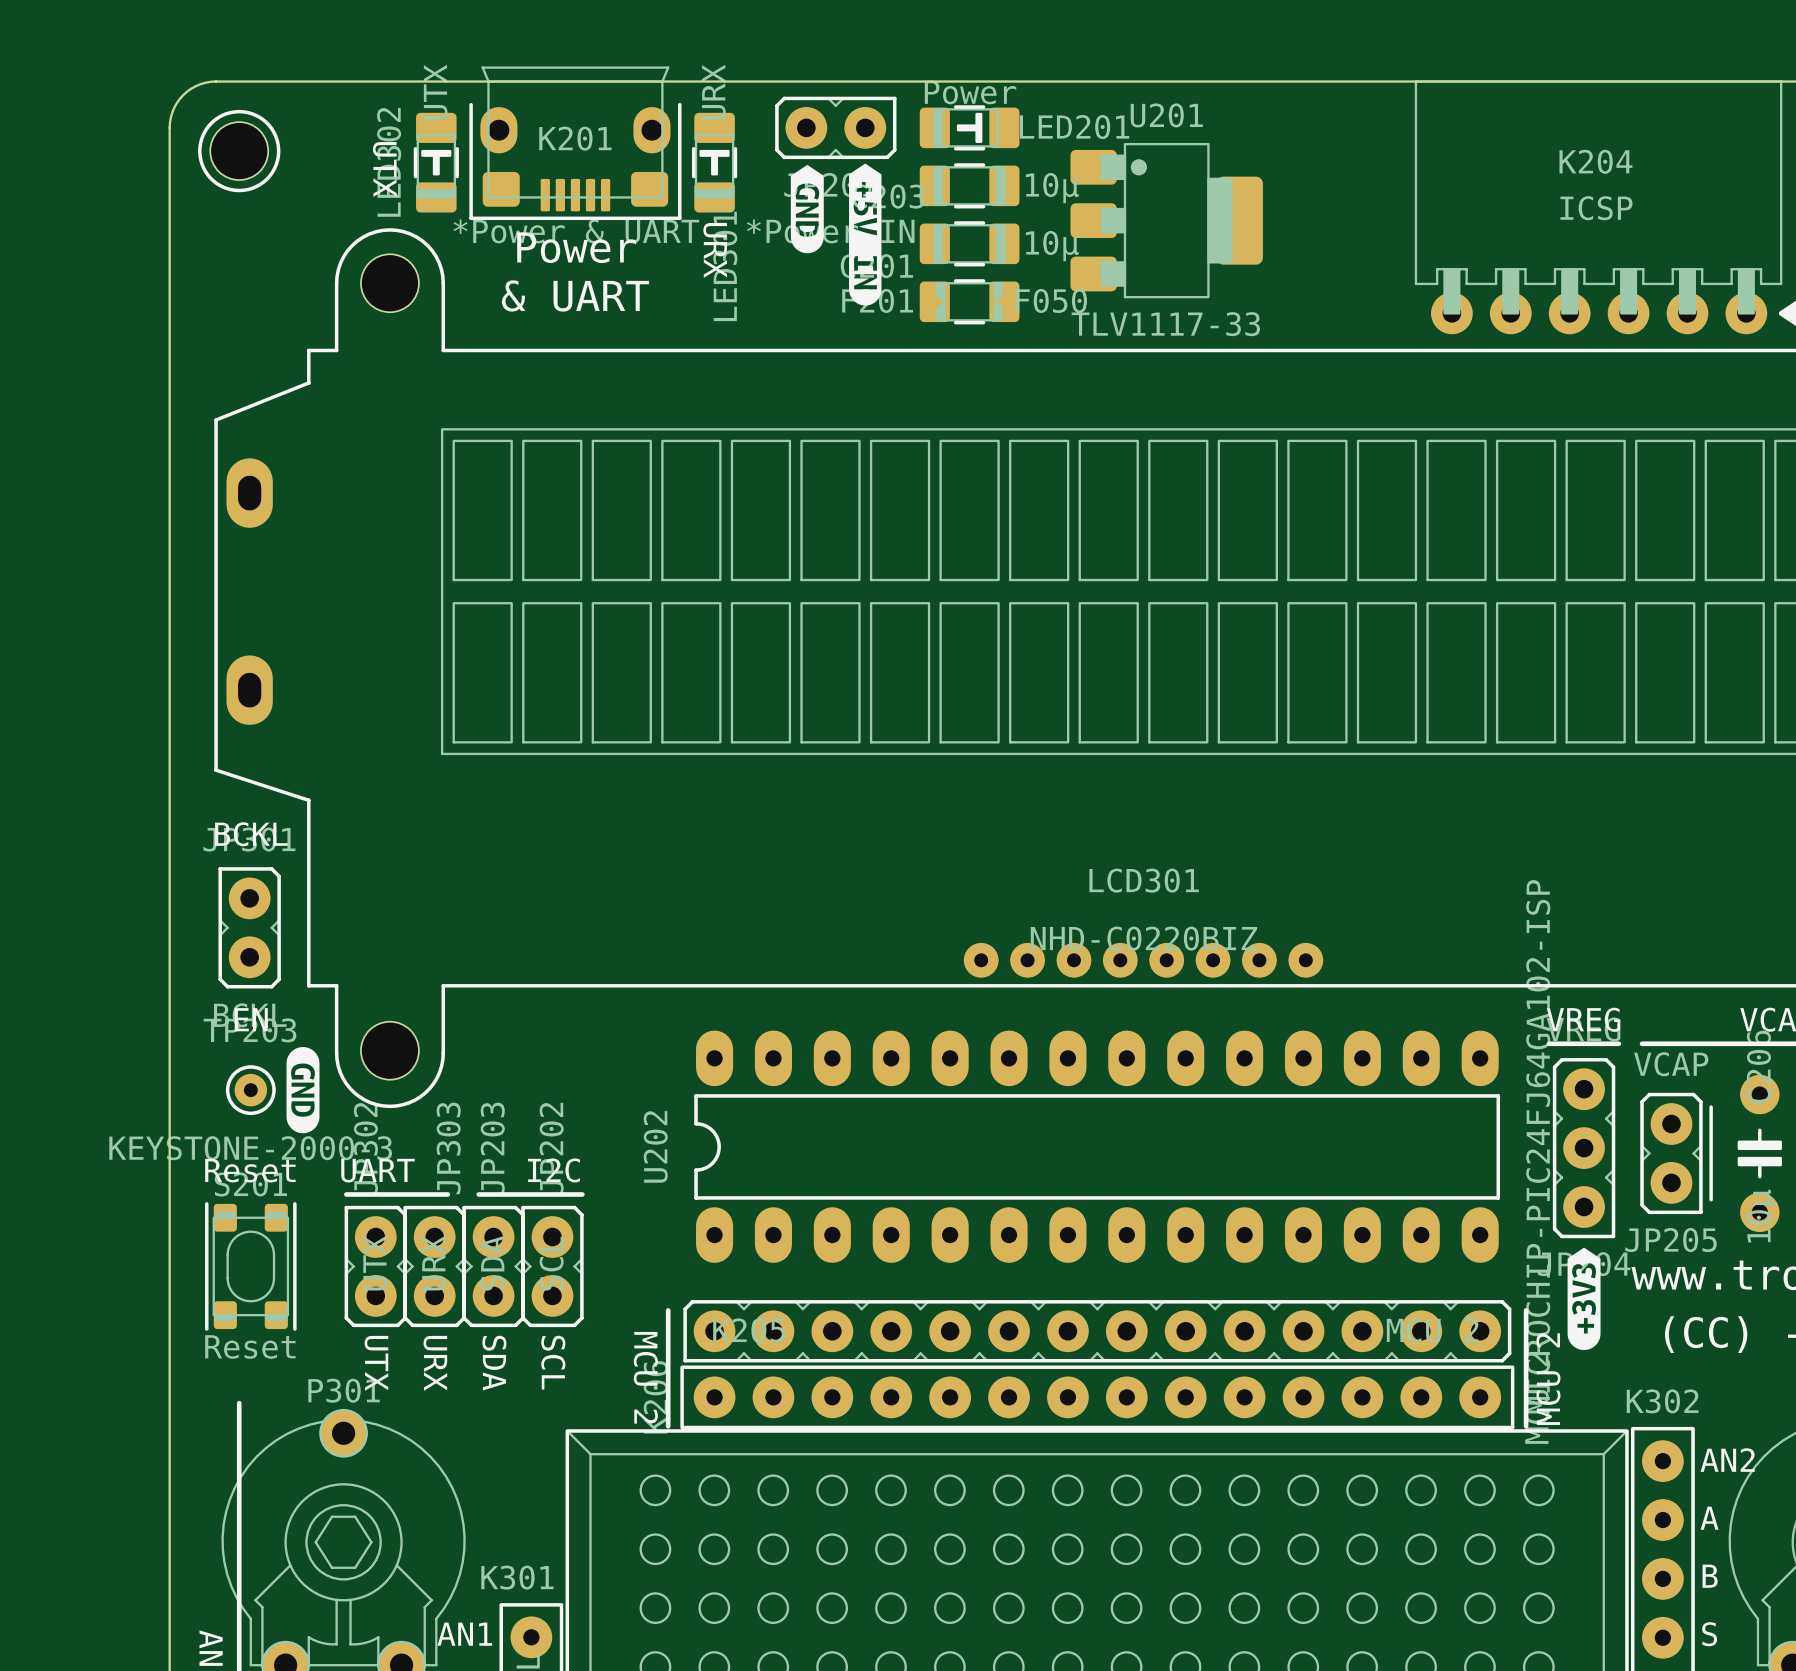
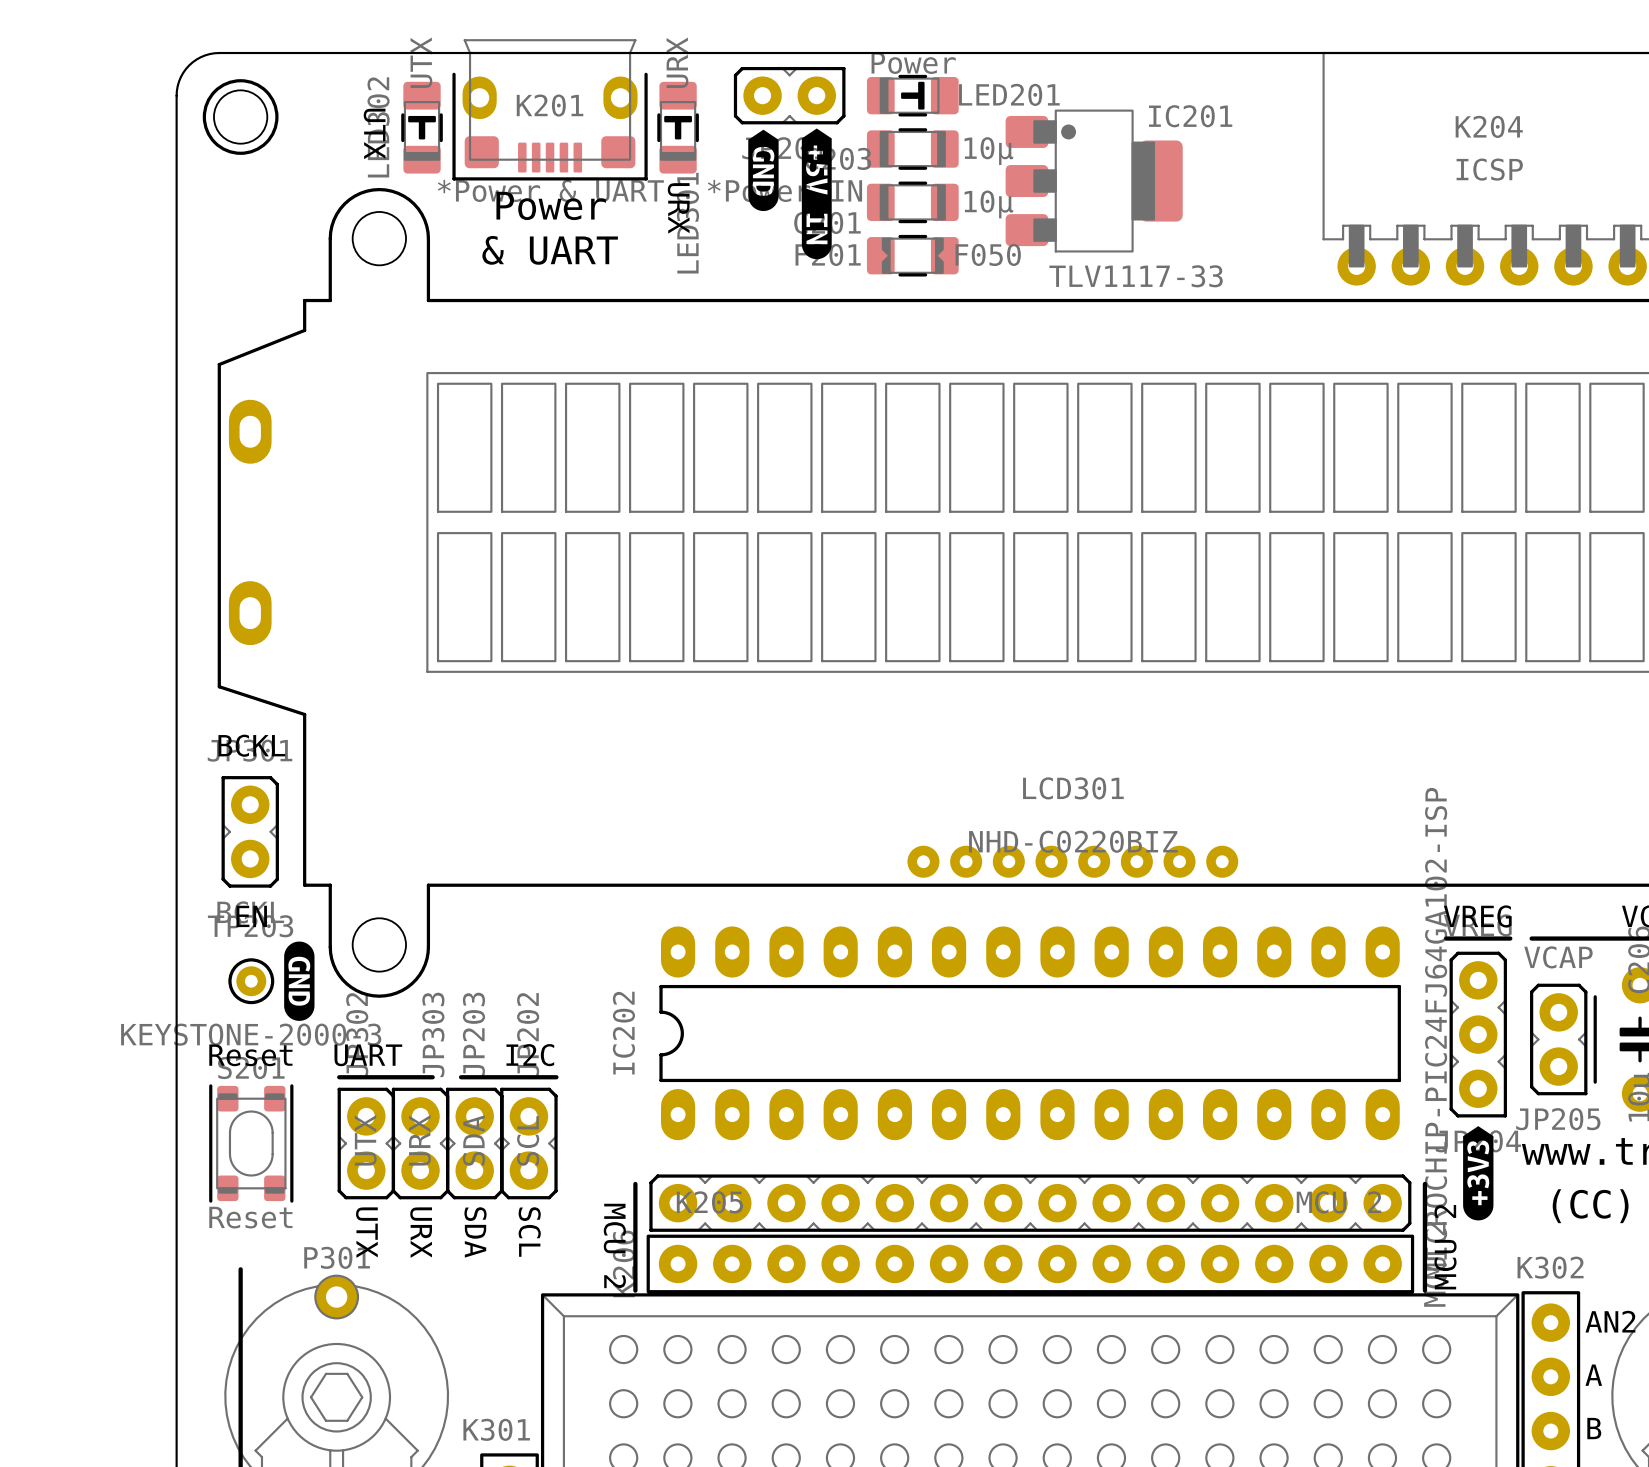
U201 name: U201 (1166, 115) -> IC201 (1190, 116)
U201 value position: TLV1117-33 (1165, 324) -> TLV1117-33 (1136, 276)
U202 name: U202 (655, 1146) -> IC202 (623, 1033)

